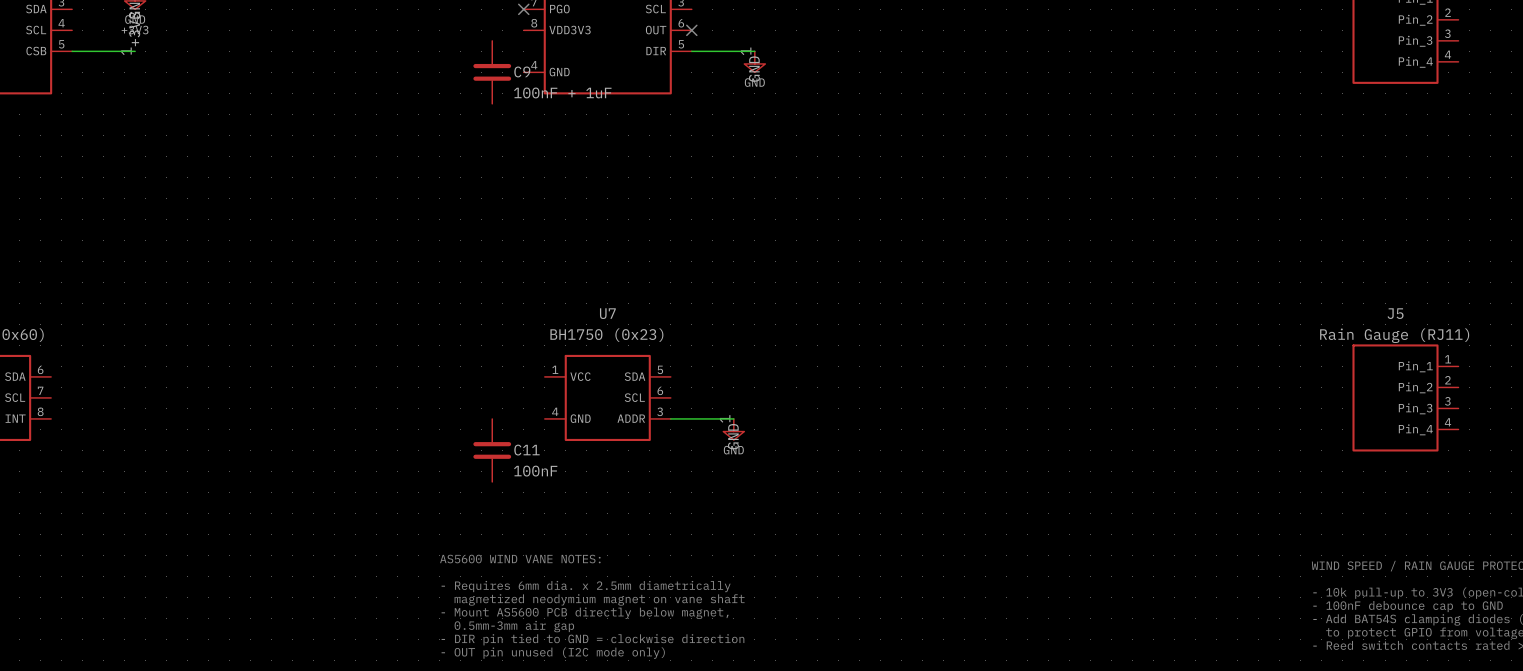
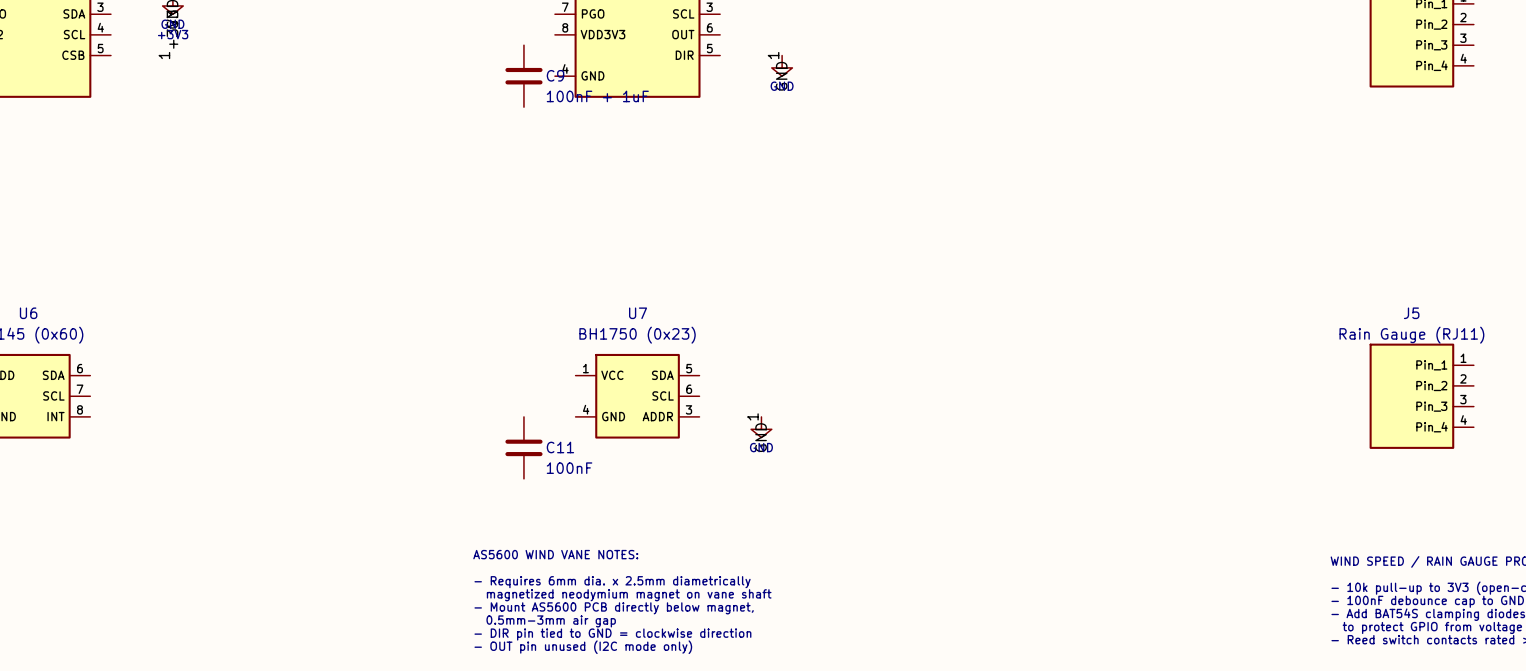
no-connect mark: (523, 9) -> none
no-connect mark: (691, 30) -> none
wire: (72, 51) (135, 51) -> none
wire: (691, 51) (754, 51) -> none
wire: (670, 418) (733, 418) -> none

